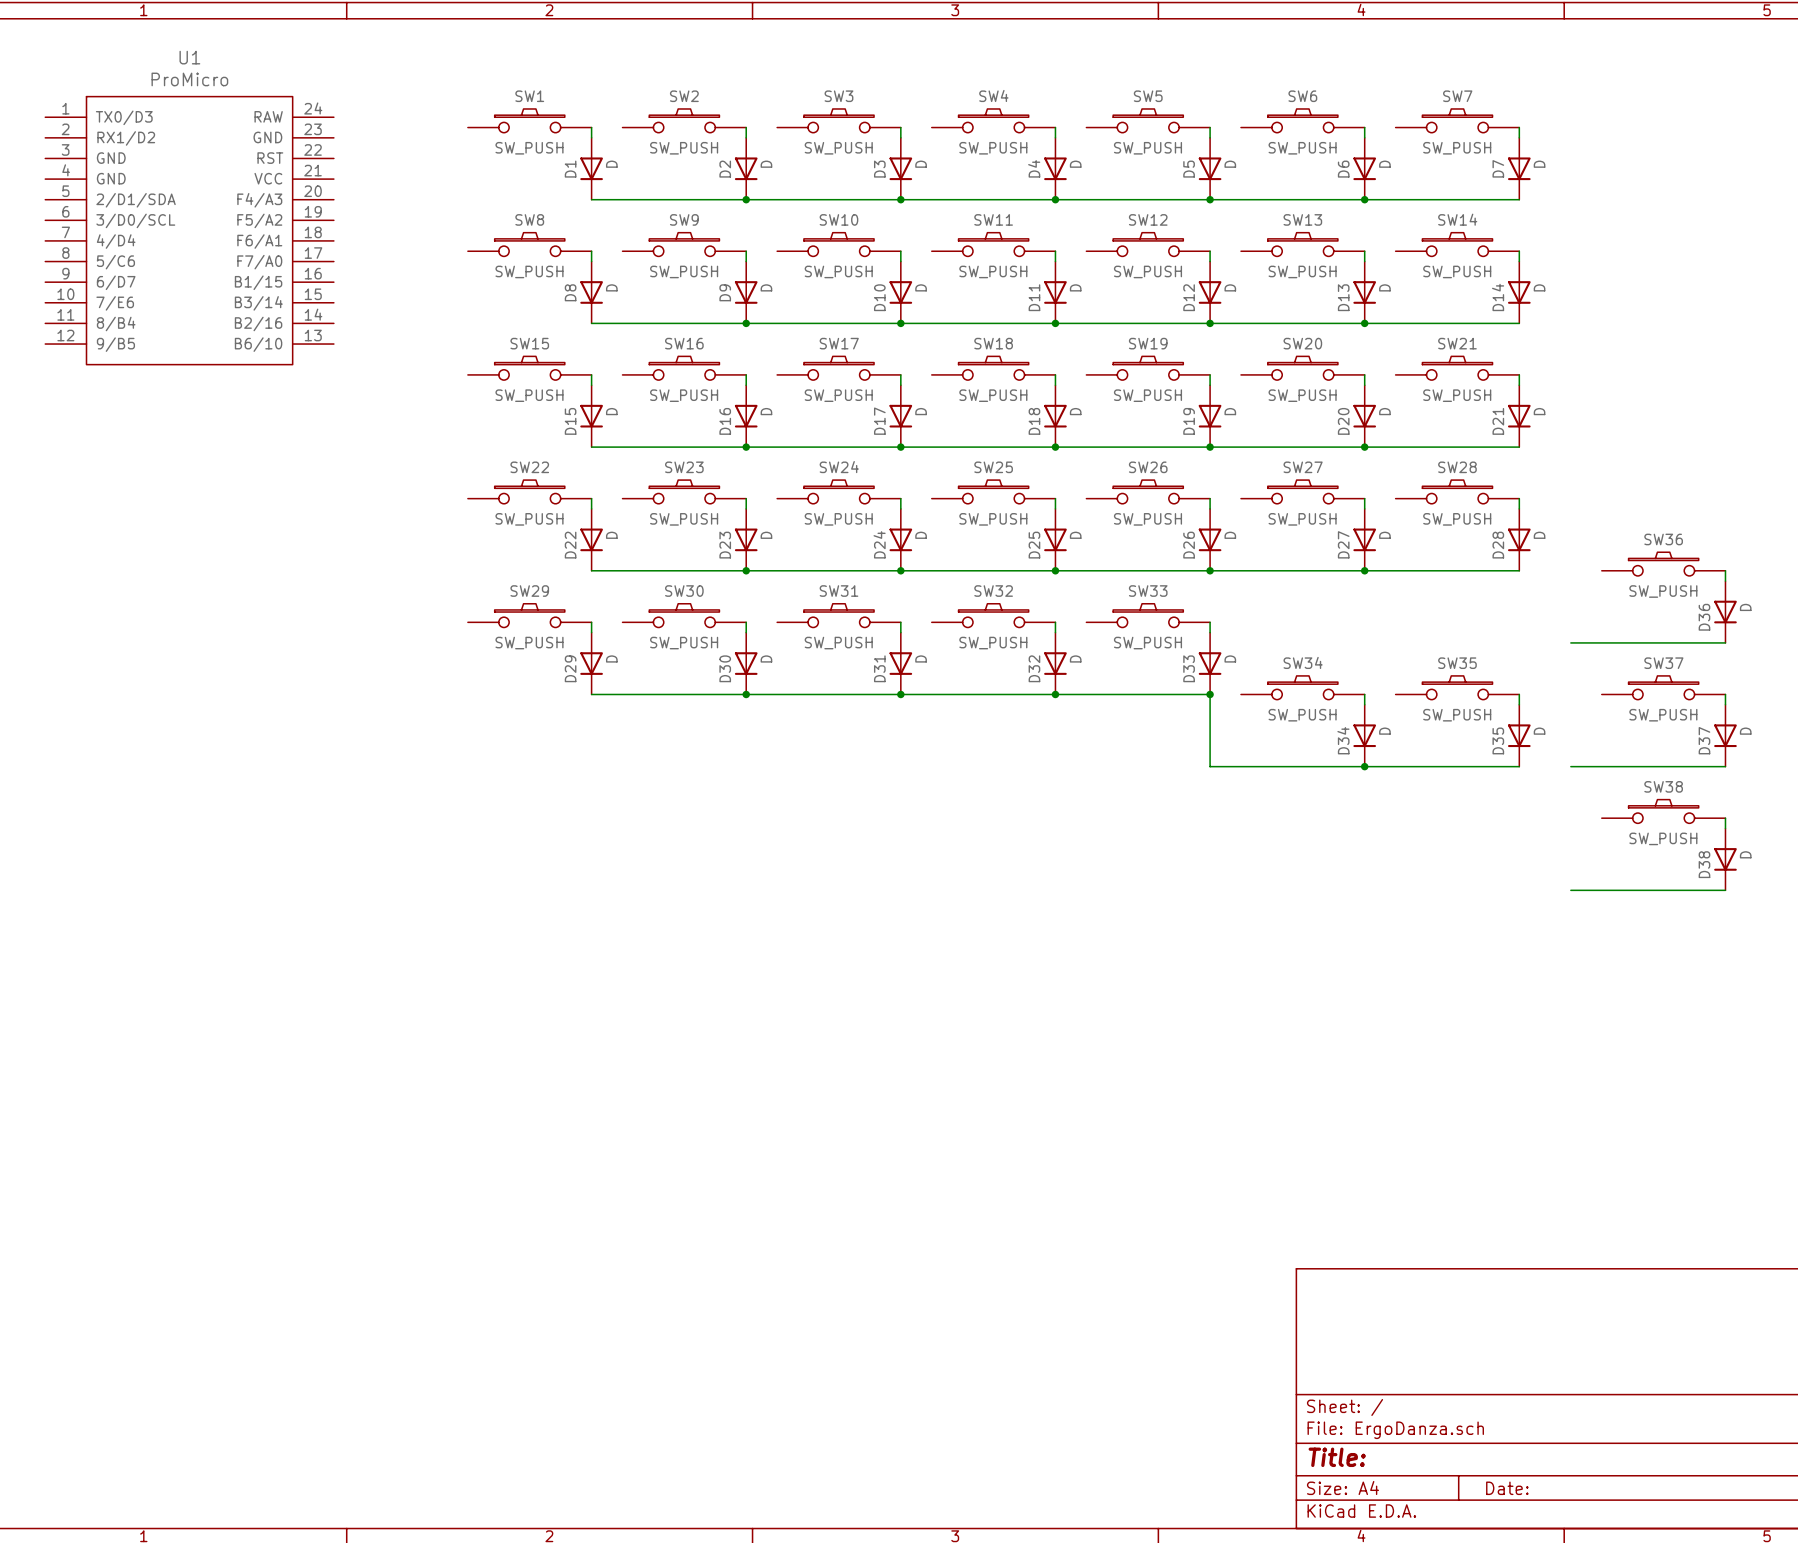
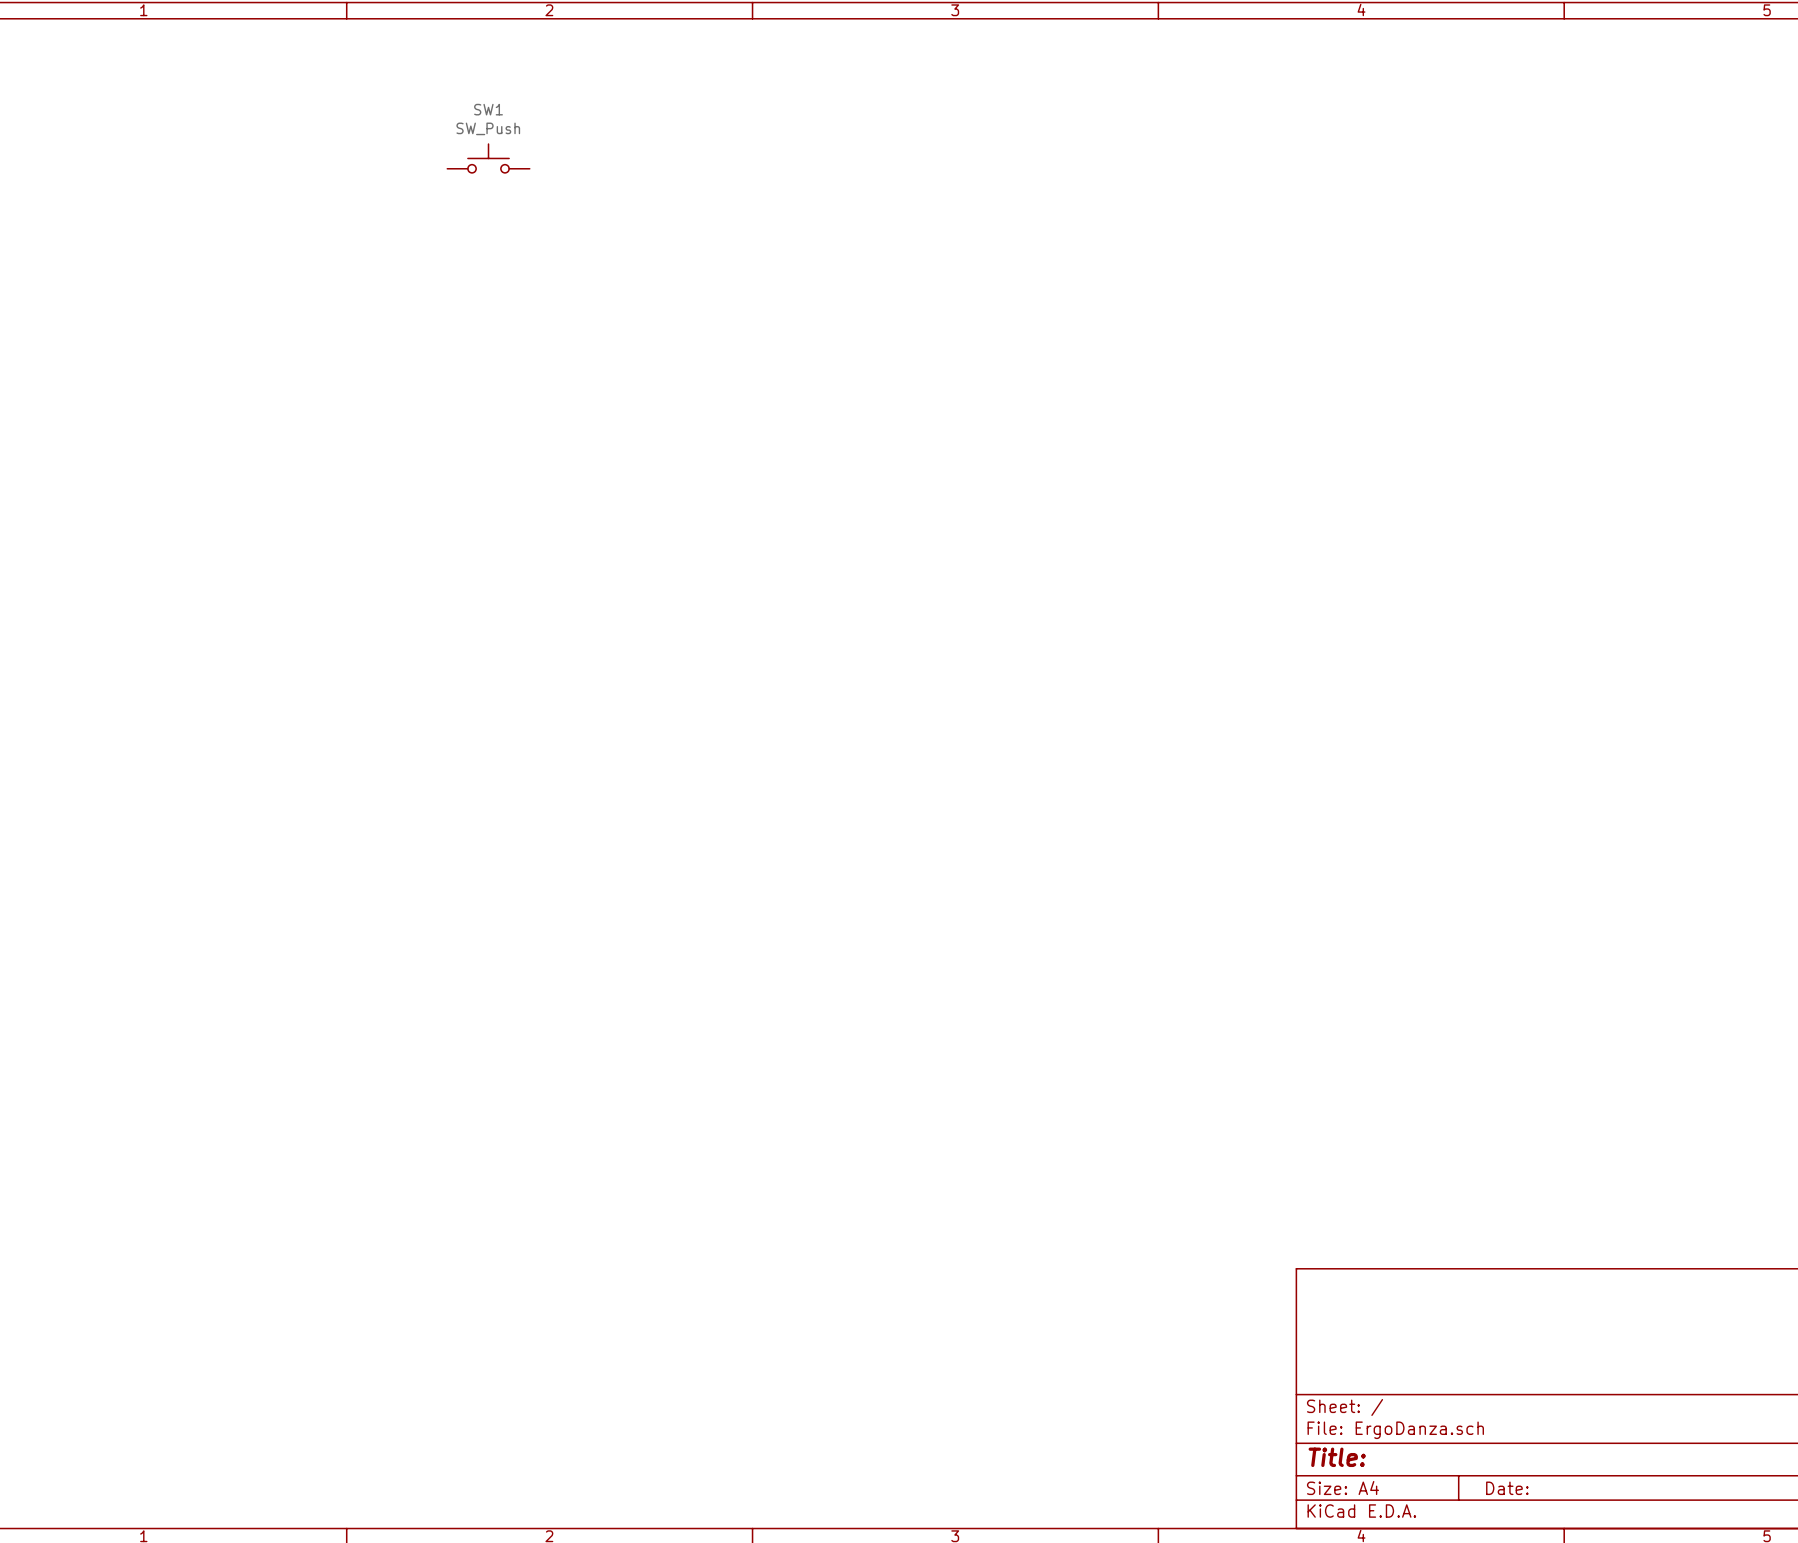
SW1 name position: SW1 (529, 96) -> SW1 (488, 109)
SW1 symbol: [467, 108, 592, 133] -> [447, 144, 530, 173]
SW2: SW_PUSH (684, 120) -> none
SW3: SW_PUSH (838, 120) -> none
SW4: SW_PUSH (993, 120) -> none
SW5: SW_PUSH (1148, 120) -> none
SW6: SW_PUSH (1302, 120) -> none
SW7: SW_PUSH (1457, 120) -> none
wire: (591, 127) (591, 137) -> none
wire: (746, 127) (746, 137) -> none
wire: (900, 127) (900, 137) -> none
wire: (1055, 127) (1055, 137) -> none
wire: (1210, 127) (1210, 137) -> none
wire: (1364, 127) (1364, 137) -> none
wire: (1519, 127) (1519, 137) -> none
SW1 value: SW_PUSH (529, 148) -> SW_Push (488, 128)
D1: D (591, 168) -> none
D2: D (746, 168) -> none
D3: D (900, 168) -> none
D4: D (1055, 168) -> none
D5: D (1210, 168) -> none
D6: D (1364, 168) -> none
D7: D (1519, 168) -> none
wire: (591, 199) (1519, 199) -> none
junction: (746, 199) -> none
junction: (900, 199) -> none
junction: (1055, 199) -> none
junction: (1210, 199) -> none
junction: (1364, 199) -> none
U1: ProMicro (189, 230) -> none
SW8: SW_PUSH (529, 244) -> none
SW9: SW_PUSH (684, 244) -> none
SW10: SW_PUSH (838, 244) -> none
SW11: SW_PUSH (993, 244) -> none
SW12: SW_PUSH (1148, 244) -> none
SW13: SW_PUSH (1302, 244) -> none
SW14: SW_PUSH (1457, 244) -> none
wire: (591, 251) (591, 261) -> none
wire: (746, 251) (746, 261) -> none
wire: (900, 251) (900, 261) -> none
wire: (1055, 251) (1055, 261) -> none
wire: (1210, 251) (1210, 261) -> none
wire: (1364, 251) (1364, 261) -> none
wire: (1519, 251) (1519, 261) -> none
D8: D (591, 292) -> none
D9: D (746, 292) -> none
D10: D (900, 292) -> none
D11: D (1055, 292) -> none
D12: D (1210, 292) -> none
D13: D (1364, 292) -> none
D14: D (1519, 292) -> none
wire: (591, 323) (1519, 323) -> none
junction: (746, 323) -> none
junction: (900, 323) -> none
junction: (1055, 323) -> none
junction: (1210, 323) -> none
junction: (1364, 323) -> none
SW15: SW_PUSH (529, 368) -> none
SW16: SW_PUSH (684, 368) -> none
SW17: SW_PUSH (838, 368) -> none
SW18: SW_PUSH (993, 368) -> none
SW19: SW_PUSH (1148, 368) -> none
SW20: SW_PUSH (1302, 368) -> none
SW21: SW_PUSH (1457, 368) -> none
wire: (591, 374) (591, 385) -> none
wire: (746, 374) (746, 385) -> none
wire: (900, 374) (900, 385) -> none
wire: (1055, 374) (1055, 385) -> none
wire: (1210, 374) (1210, 385) -> none
wire: (1364, 374) (1364, 385) -> none
wire: (1519, 374) (1519, 385) -> none
D15: D (591, 416) -> none
D16: D (746, 416) -> none
D17: D (900, 416) -> none
D18: D (1055, 416) -> none
D19: D (1210, 416) -> none
D20: D (1364, 416) -> none
D21: D (1519, 416) -> none
wire: (591, 447) (1519, 447) -> none
junction: (746, 447) -> none
junction: (900, 447) -> none
junction: (1055, 447) -> none
junction: (1210, 447) -> none
junction: (1364, 447) -> none
SW22: SW_PUSH (529, 491) -> none
SW23: SW_PUSH (684, 491) -> none
SW24: SW_PUSH (838, 491) -> none
SW25: SW_PUSH (993, 491) -> none
SW26: SW_PUSH (1148, 491) -> none
SW27: SW_PUSH (1302, 491) -> none
SW28: SW_PUSH (1457, 491) -> none
wire: (591, 498) (591, 508) -> none
wire: (746, 498) (746, 508) -> none
wire: (900, 498) (900, 508) -> none
wire: (1055, 498) (1055, 508) -> none
wire: (1210, 498) (1210, 508) -> none
wire: (1364, 498) (1364, 508) -> none
wire: (1519, 498) (1519, 508) -> none
D22: D (591, 539) -> none
D23: D (746, 539) -> none
D24: D (900, 539) -> none
D25: D (1055, 539) -> none
D26: D (1210, 539) -> none
D27: D (1364, 539) -> none
D28: D (1519, 539) -> none
SW36: SW_PUSH (1663, 564) -> none
wire: (591, 570) (1519, 570) -> none
junction: (746, 570) -> none
junction: (900, 570) -> none
junction: (1055, 570) -> none
junction: (1210, 570) -> none
junction: (1364, 570) -> none
wire: (1725, 570) (1725, 581) -> none
D36: D (1725, 612) -> none
SW29: SW_PUSH (529, 615) -> none
SW30: SW_PUSH (684, 615) -> none
SW31: SW_PUSH (838, 615) -> none
SW32: SW_PUSH (993, 615) -> none
SW33: SW_PUSH (1148, 615) -> none
wire: (591, 622) (591, 632) -> none
wire: (746, 622) (746, 632) -> none
wire: (900, 622) (900, 632) -> none
wire: (1055, 622) (1055, 632) -> none
wire: (1210, 622) (1210, 632) -> none
wire: (1570, 642) (1725, 642) -> none
D29: D (591, 663) -> none
D30: D (746, 663) -> none
D31: D (900, 663) -> none
D32: D (1055, 663) -> none
D33: D (1210, 663) -> none
SW34: SW_PUSH (1302, 687) -> none
SW35: SW_PUSH (1457, 687) -> none
SW37: SW_PUSH (1663, 687) -> none
wire: (591, 694) (1210, 694) (1210, 766) (1519, 766) -> none
junction: (746, 694) -> none
junction: (900, 694) -> none
junction: (1055, 694) -> none
junction: (1210, 694) -> none
wire: (1364, 694) (1364, 704) -> none
wire: (1519, 694) (1519, 704) -> none
wire: (1725, 694) (1725, 704) -> none
D34: D (1364, 735) -> none
D35: D (1519, 735) -> none
D37: D (1725, 735) -> none
junction: (1364, 766) -> none
wire: (1570, 766) (1725, 766) -> none
SW38: SW_PUSH (1663, 811) -> none
wire: (1725, 818) (1725, 828) -> none
D38: D (1725, 859) -> none
wire: (1570, 890) (1725, 890) -> none

